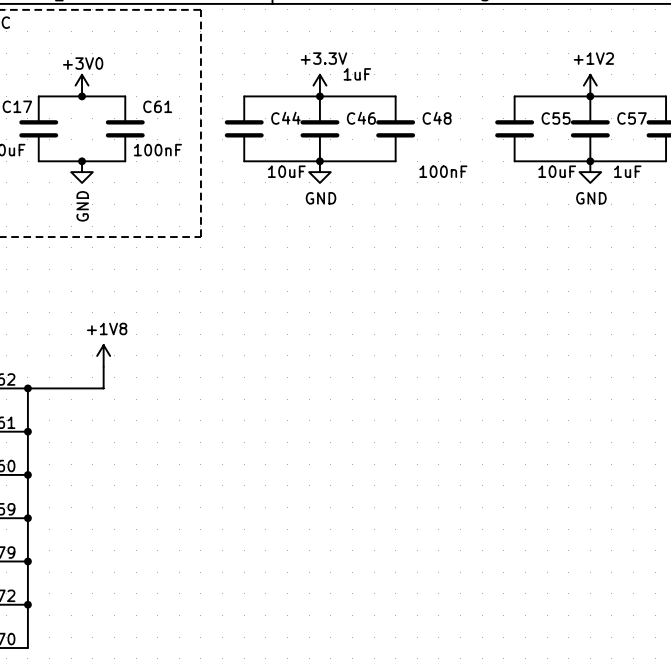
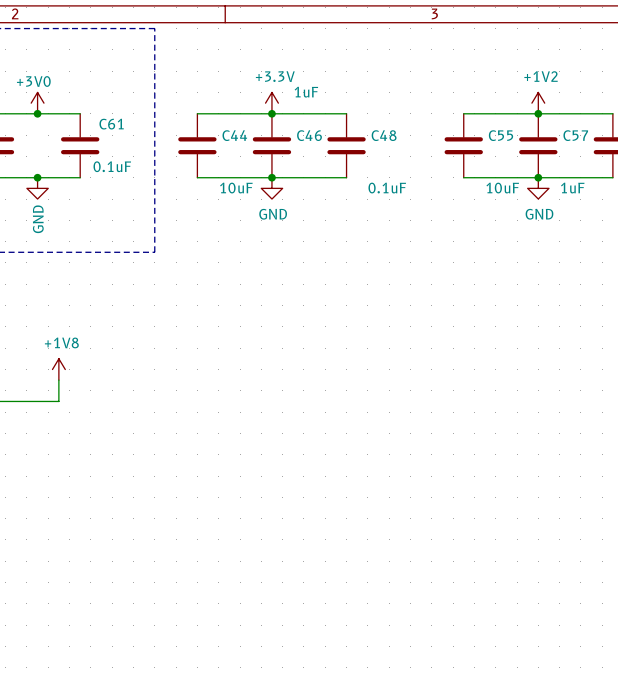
C61 value: 100nF (157, 150) -> 0.1uF (112, 166)
C48 value: 100nF (443, 171) -> 0.1uF (387, 188)

